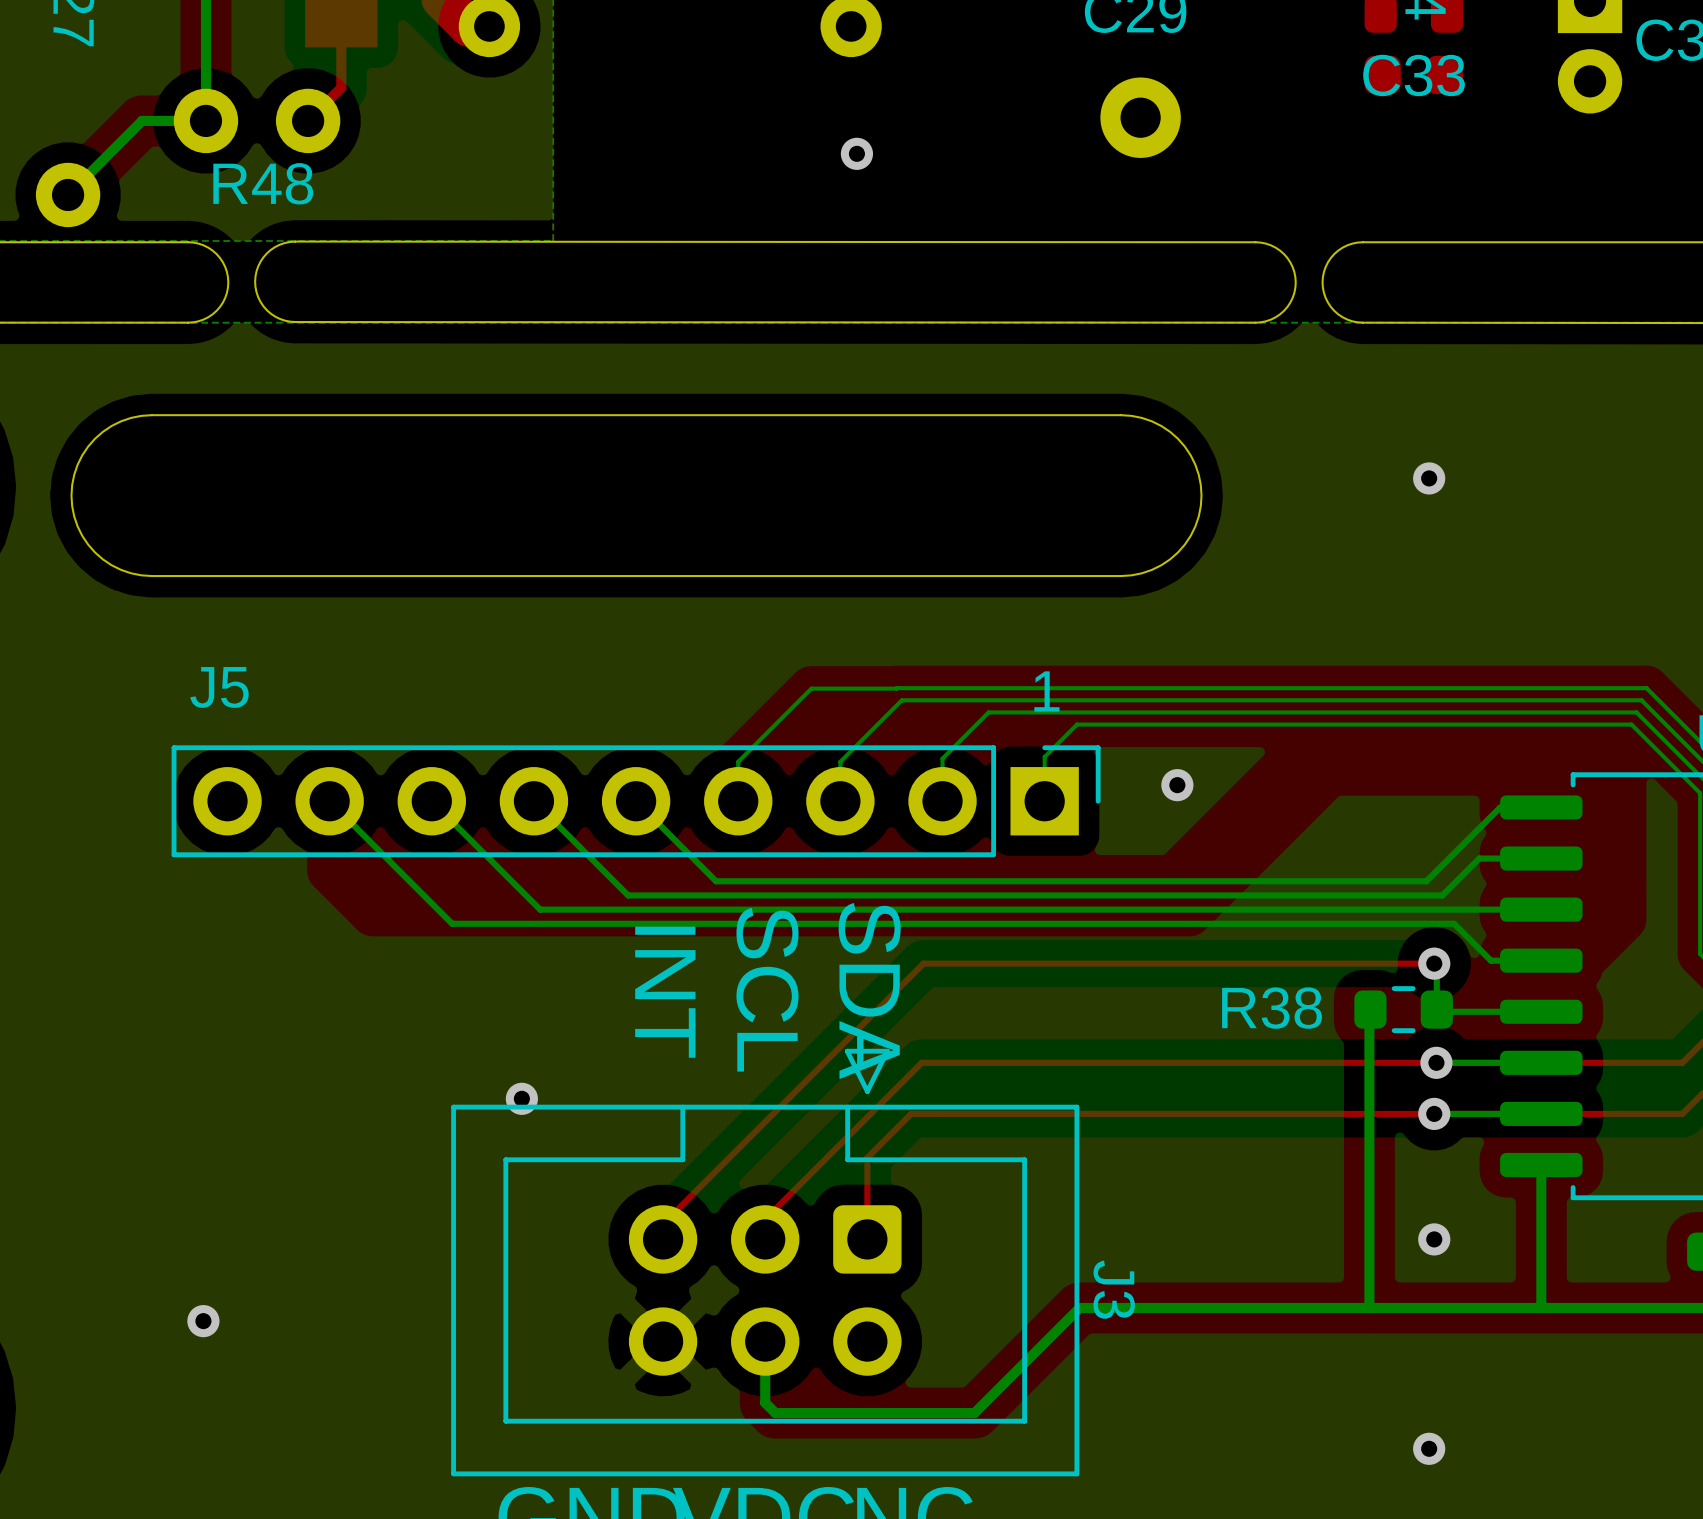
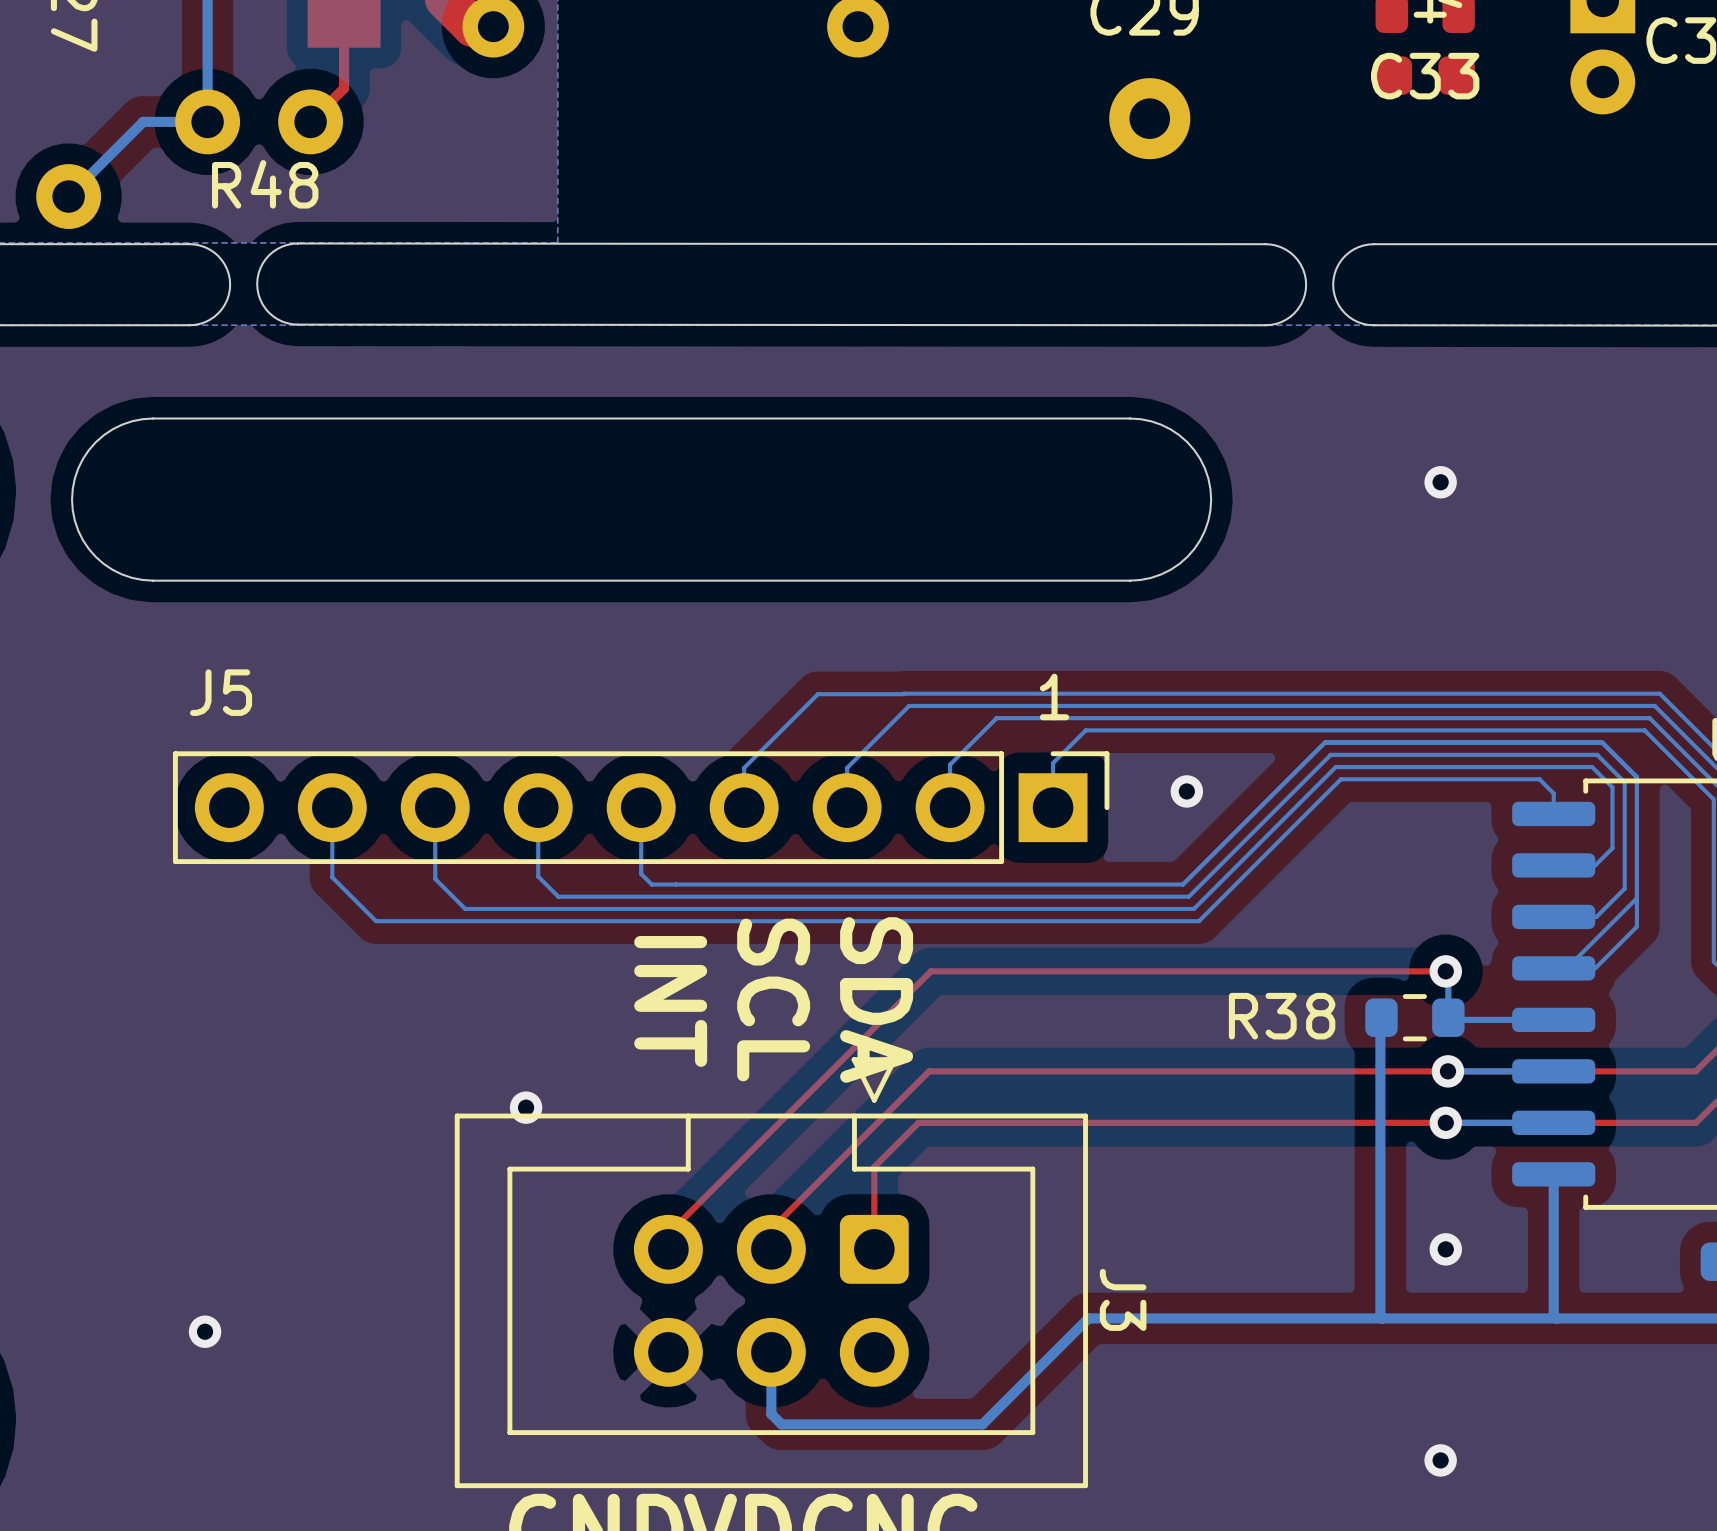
via: (856, 153) -> none
bottom track: (329, 801) (452, 923) (1454, 923) (1491, 960) (1541, 960) -> (332, 807) (332, 877) (376, 921) (1198, 921) (1340, 779) (1539, 779) (1553, 793) (1553, 813) (1555, 811)
bottom track: (431, 801) (540, 909) (1541, 909) -> (435, 807) (435, 879) (465, 908) (1193, 908) (1335, 767) (1592, 767) (1612, 787) (1612, 848) (1595, 865) (1553, 865)
bottom track: (533, 801) (628, 895) (1442, 895) (1479, 858) (1541, 858) -> (538, 807) (538, 876) (558, 896) (1188, 896) (1330, 754) (1597, 754) (1624, 782) (1624, 888) (1596, 916) (1553, 916)
bottom track: (636, 801) (716, 881) (1426, 881) (1500, 807) (1541, 807) -> (641, 807) (641, 873) (651, 884) (1182, 884) (1324, 742) (1602, 742) (1636, 777) (1636, 926) (1595, 968) (1553, 968)
bottom track: none -> (1636, 898) (1568, 966)

